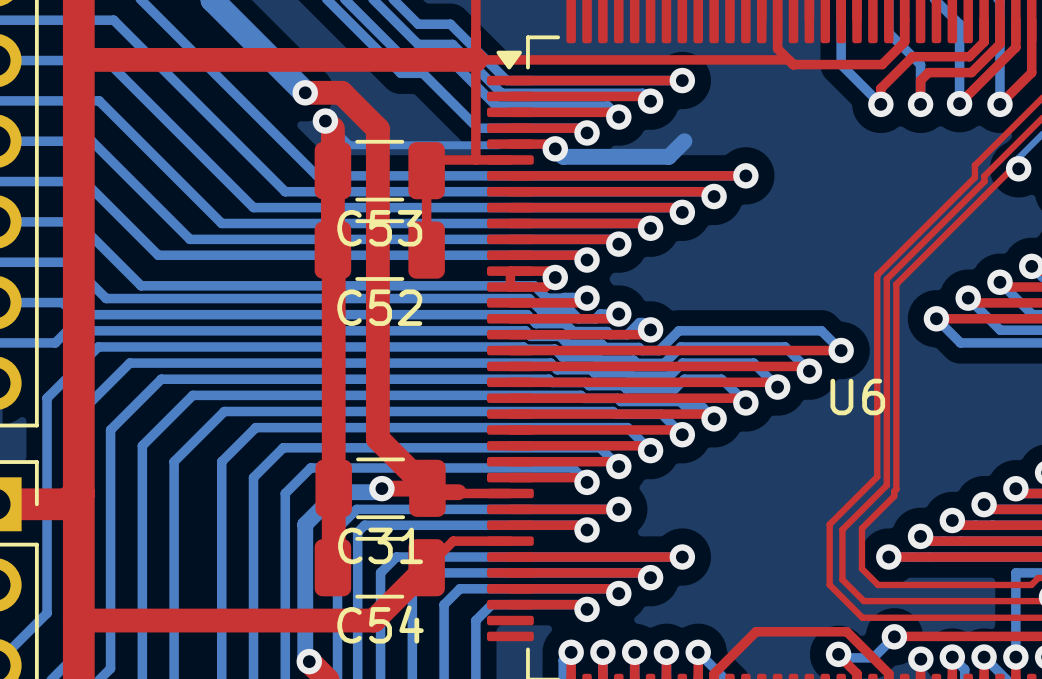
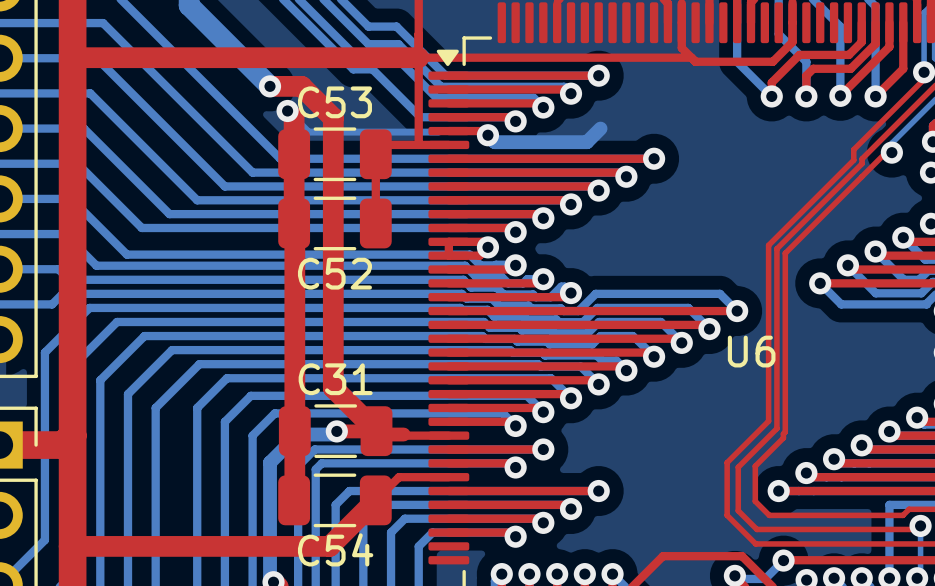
C53 name position: C53 (379, 228) -> C53 (334, 102)
C31 name position: C31 (380, 545) -> C31 (335, 379)

